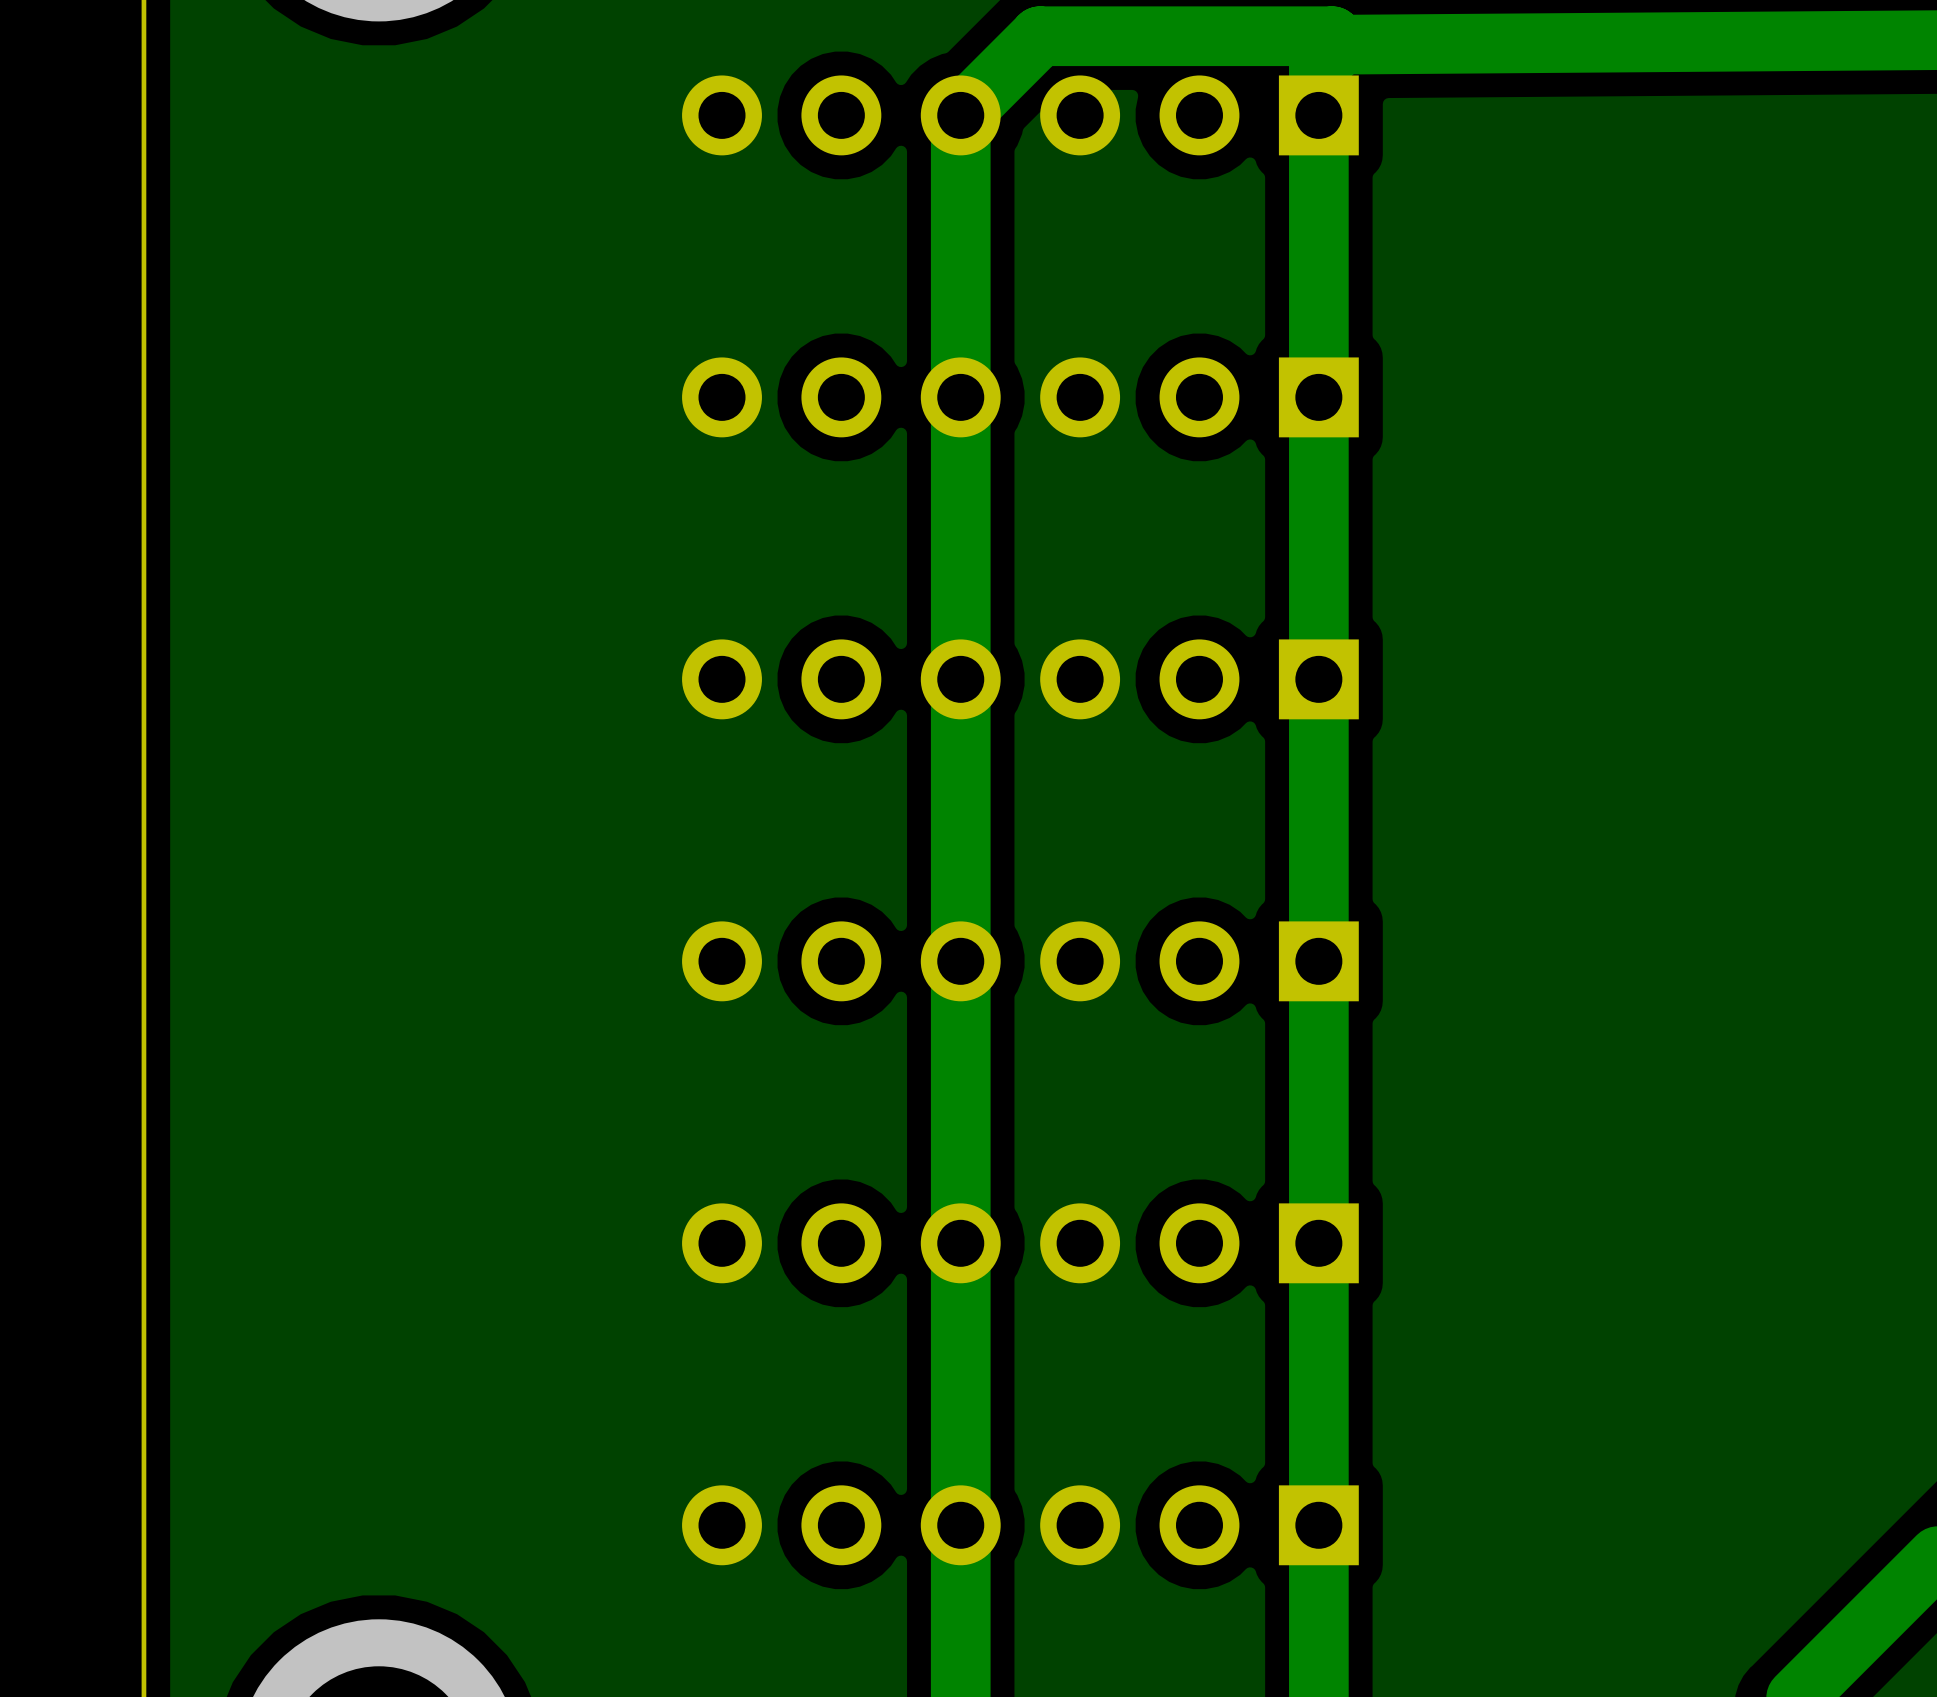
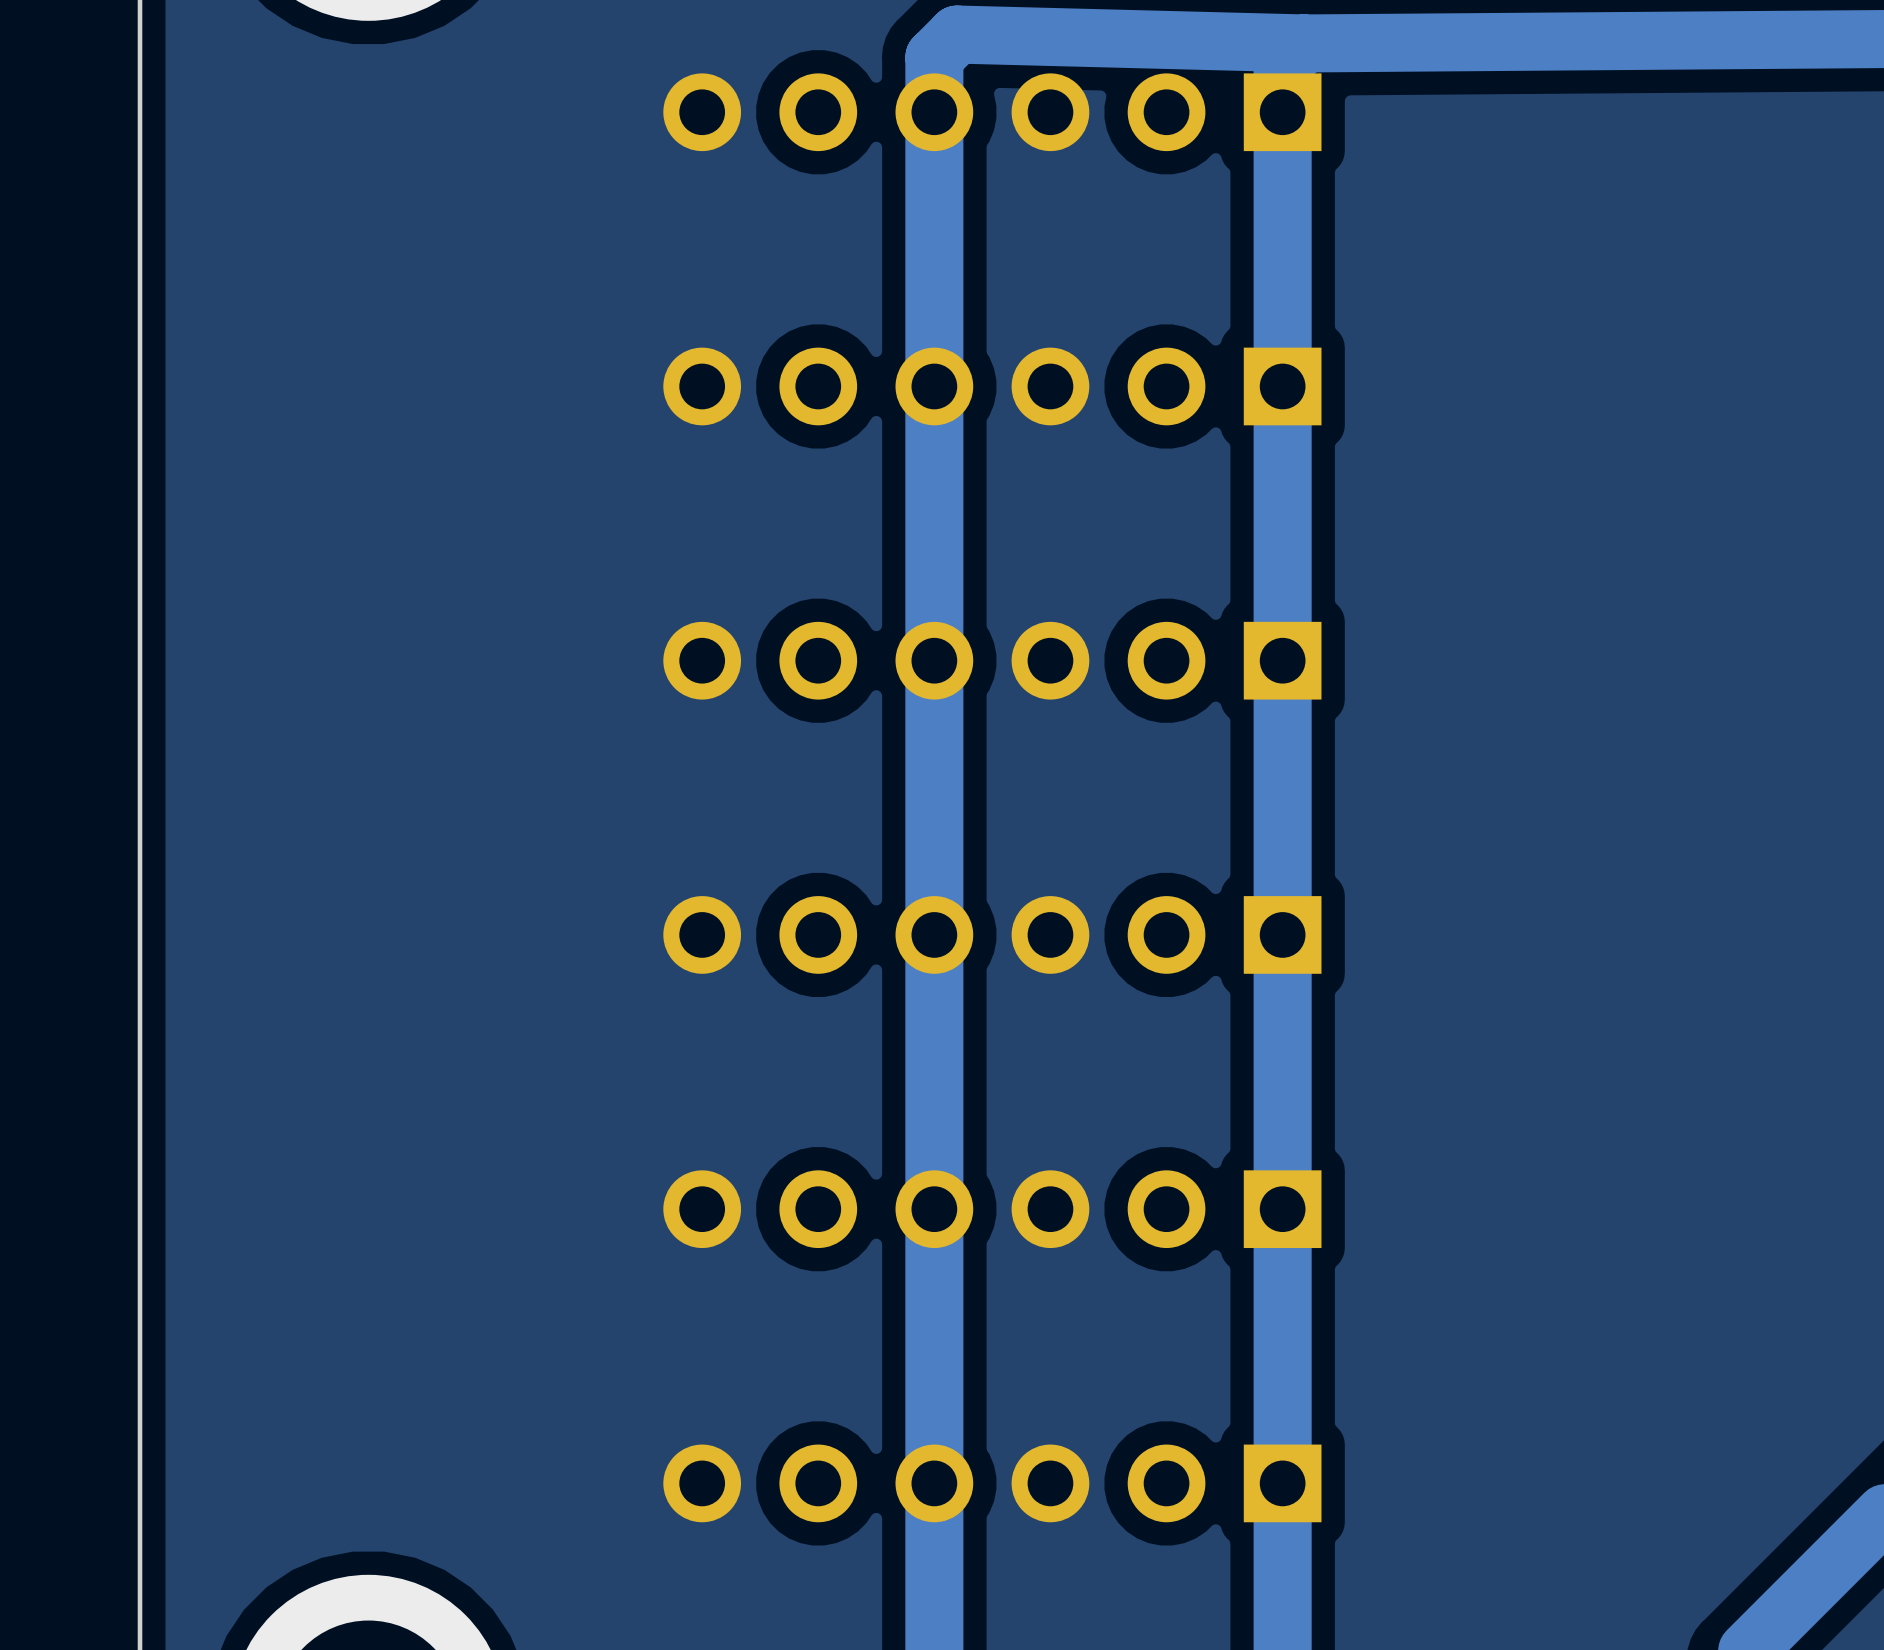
track: (1340, 44) (1332, 36) (1039, 36) (960, 115) -> (1303, 43) (957, 34) (934, 57) (934, 112)

